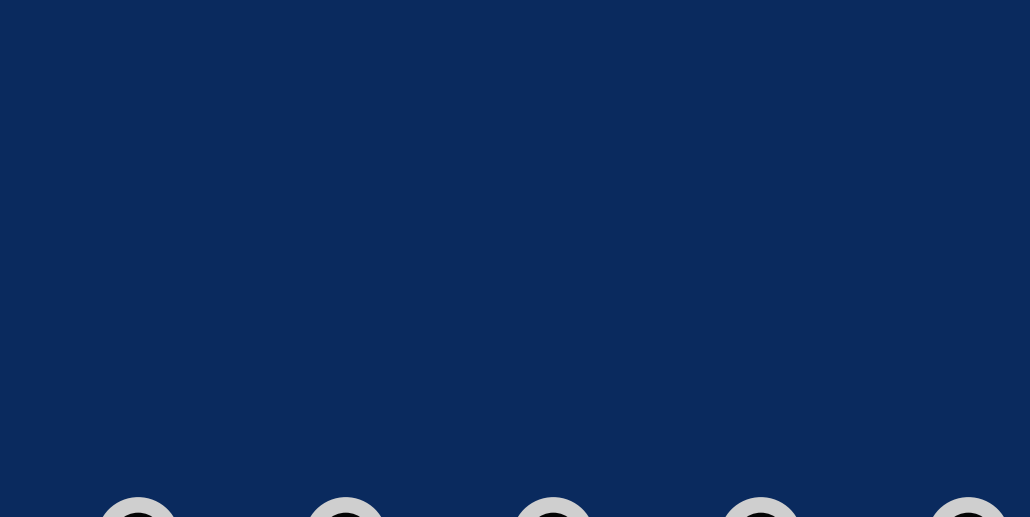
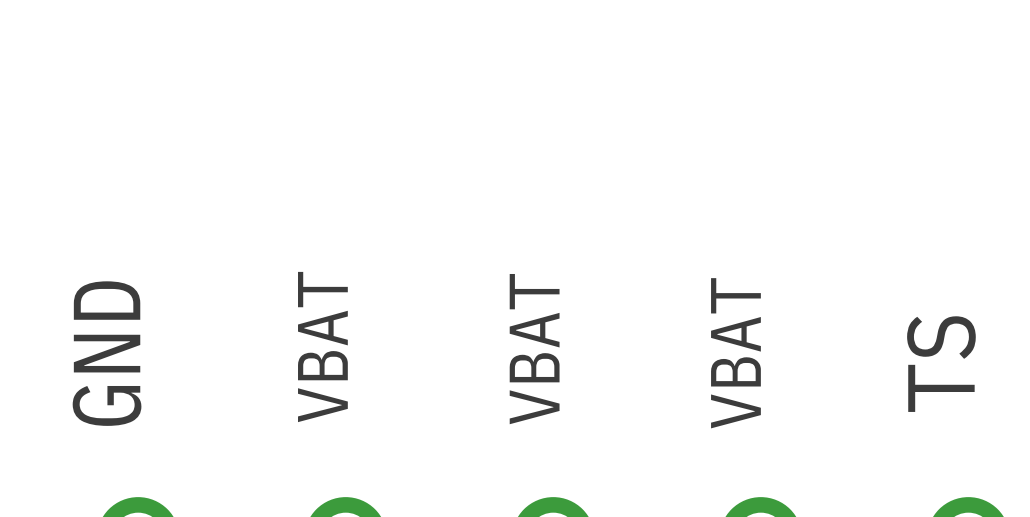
text: none -> GND (107, 353)
text: none -> VBAT (322, 347)
text: none -> VBAT (534, 349)
text: none -> VBAT (735, 353)
text: none -> TS (941, 364)

